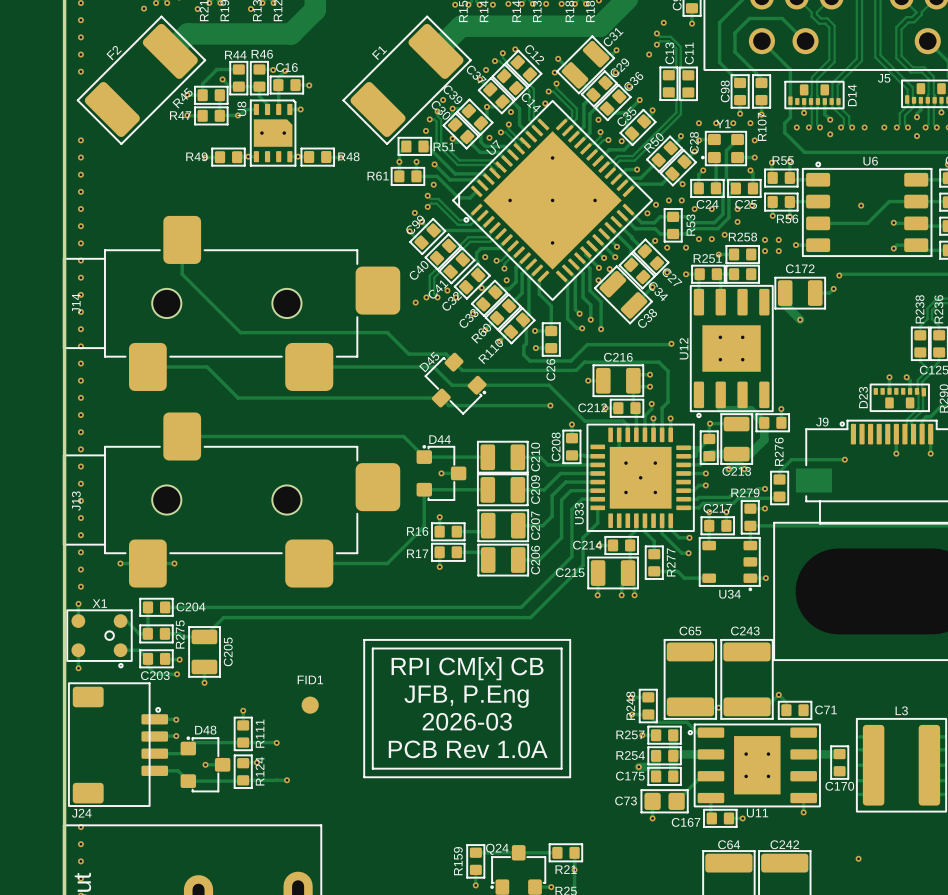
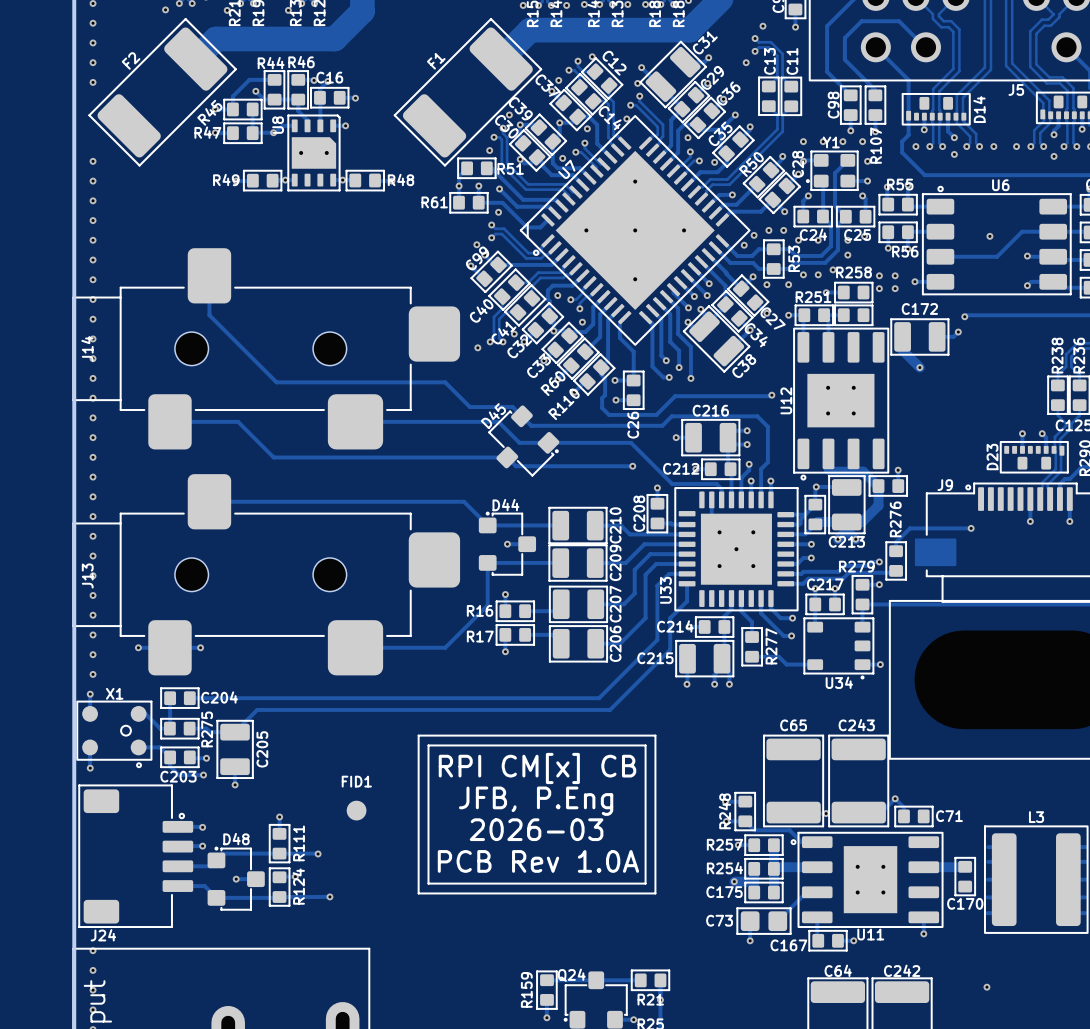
J24 footprint: [68, 682, 169, 807] -> [78, 784, 194, 928]

